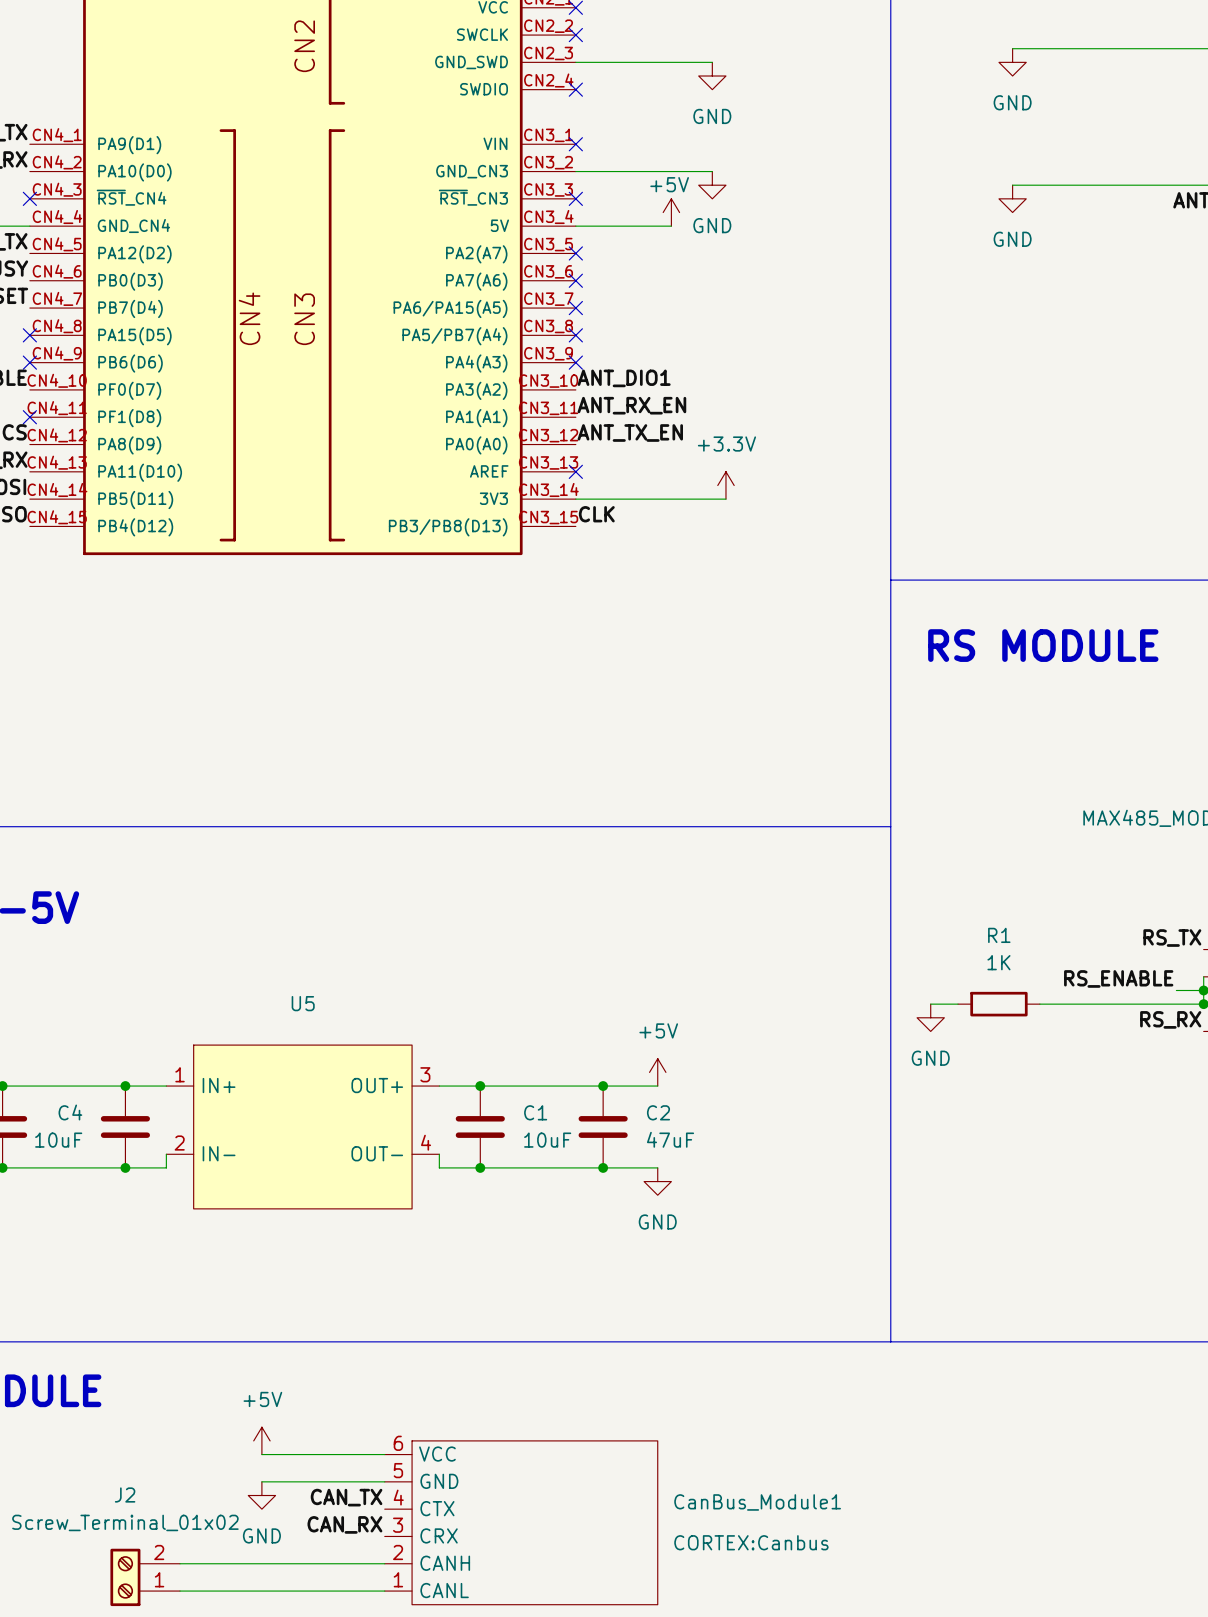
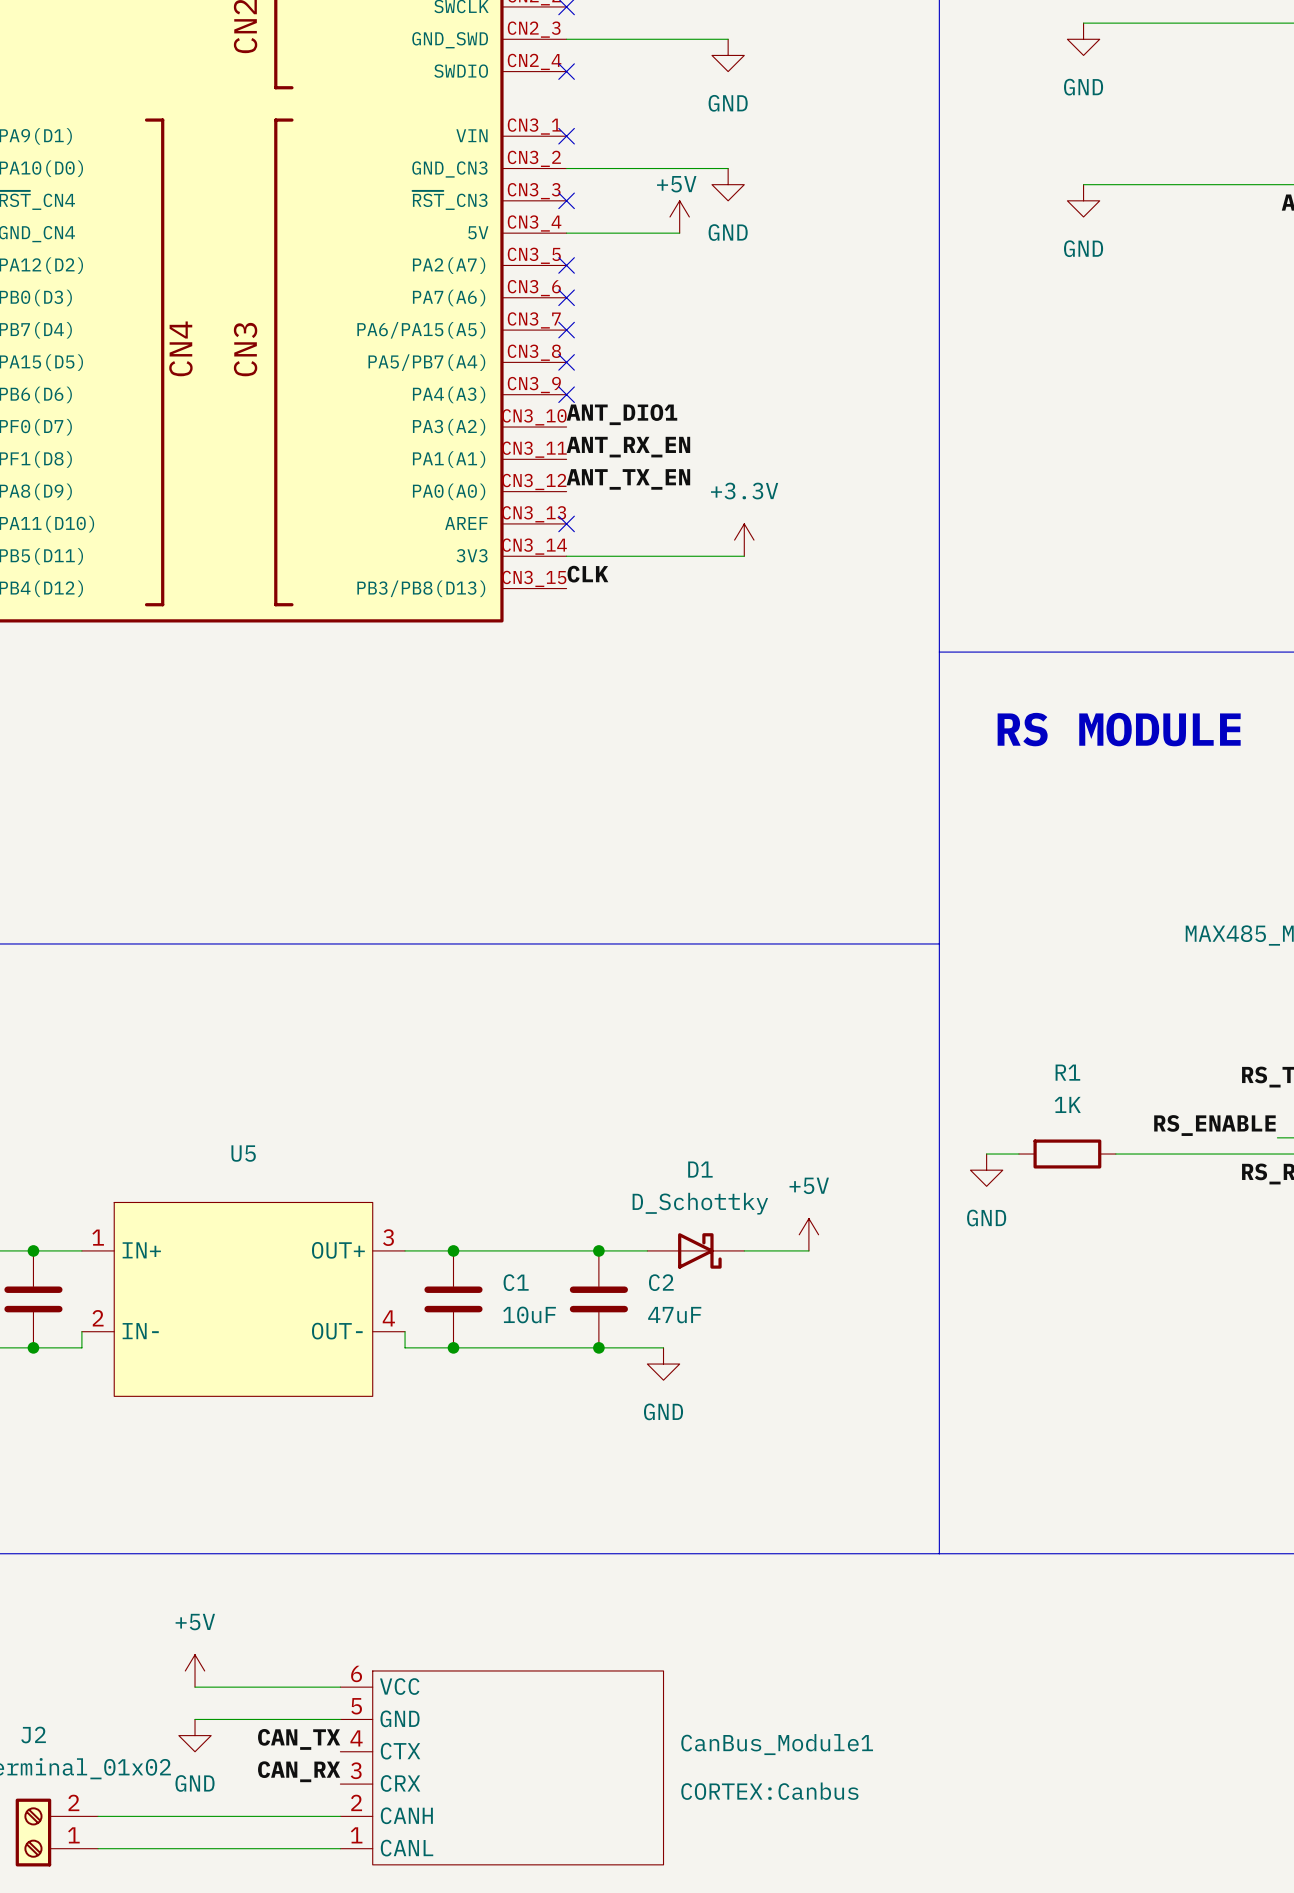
power symbol position: +5V (657, 1072) -> +5V (808, 1234)
D1: none -> D_Schottky (695, 1250)
wire: none -> (744, 1250) (808, 1250)

